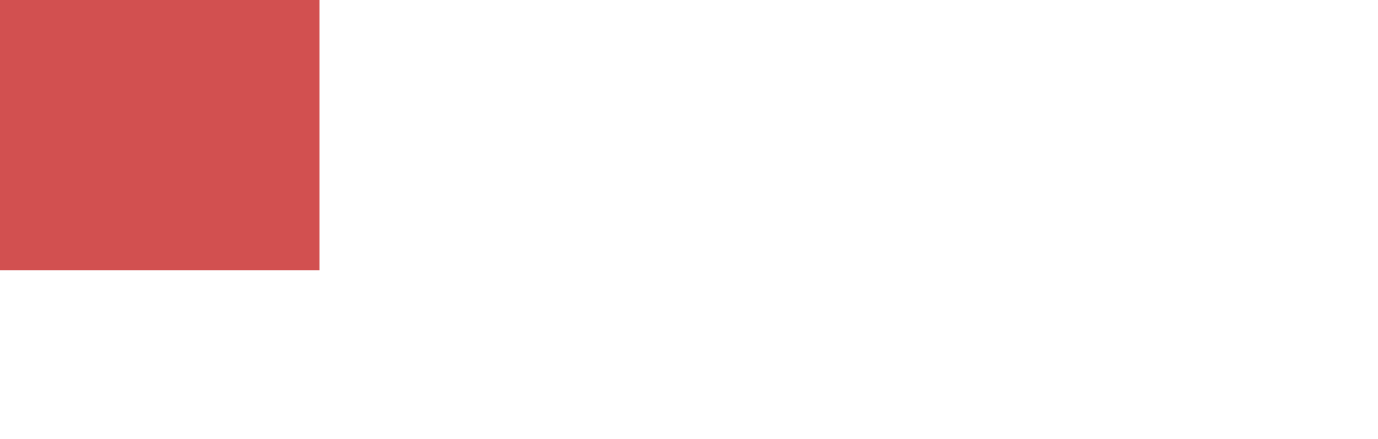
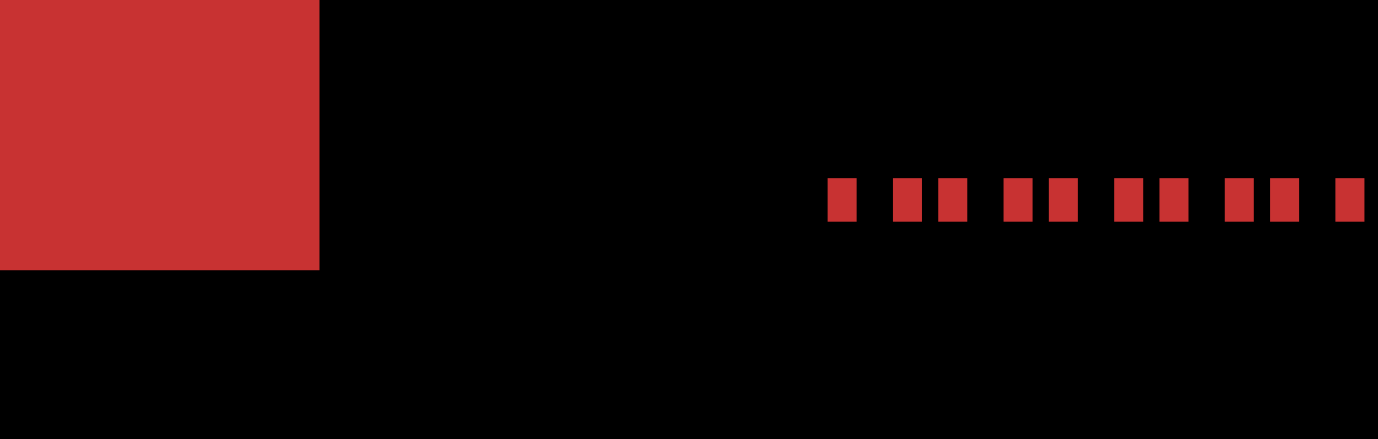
part: none -> (874, 199)
part: none -> (985, 199)
part: none -> (1096, 199)
part: none -> (1206, 199)
part: none -> (1317, 199)

